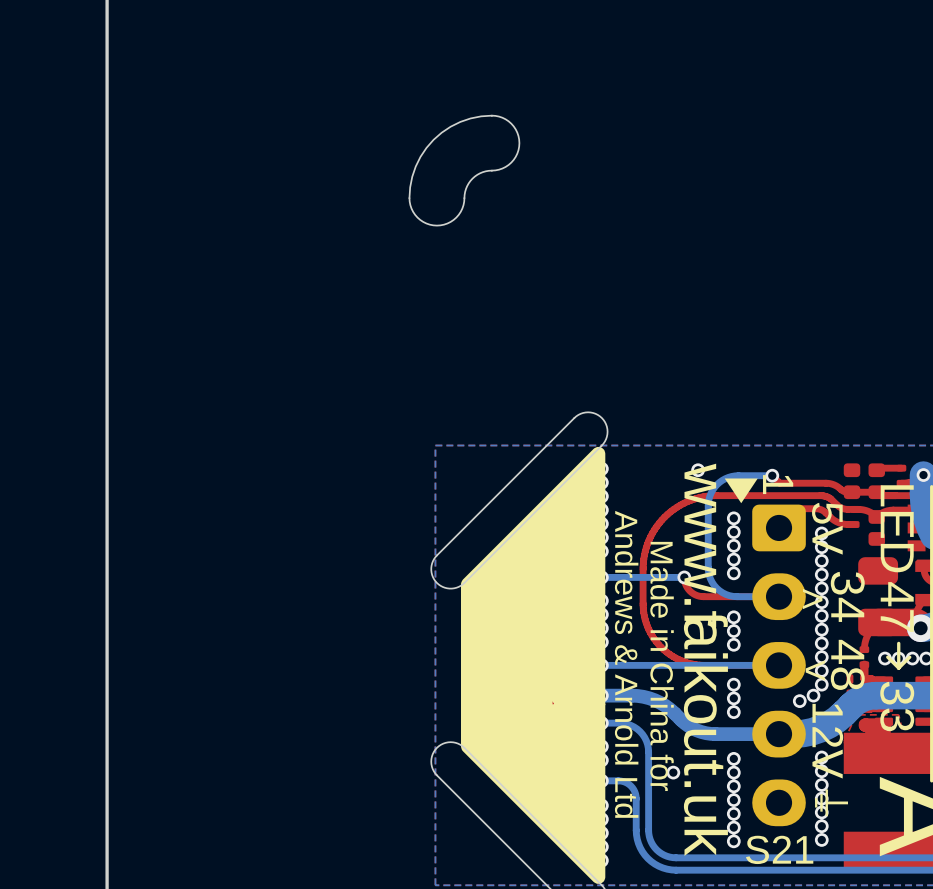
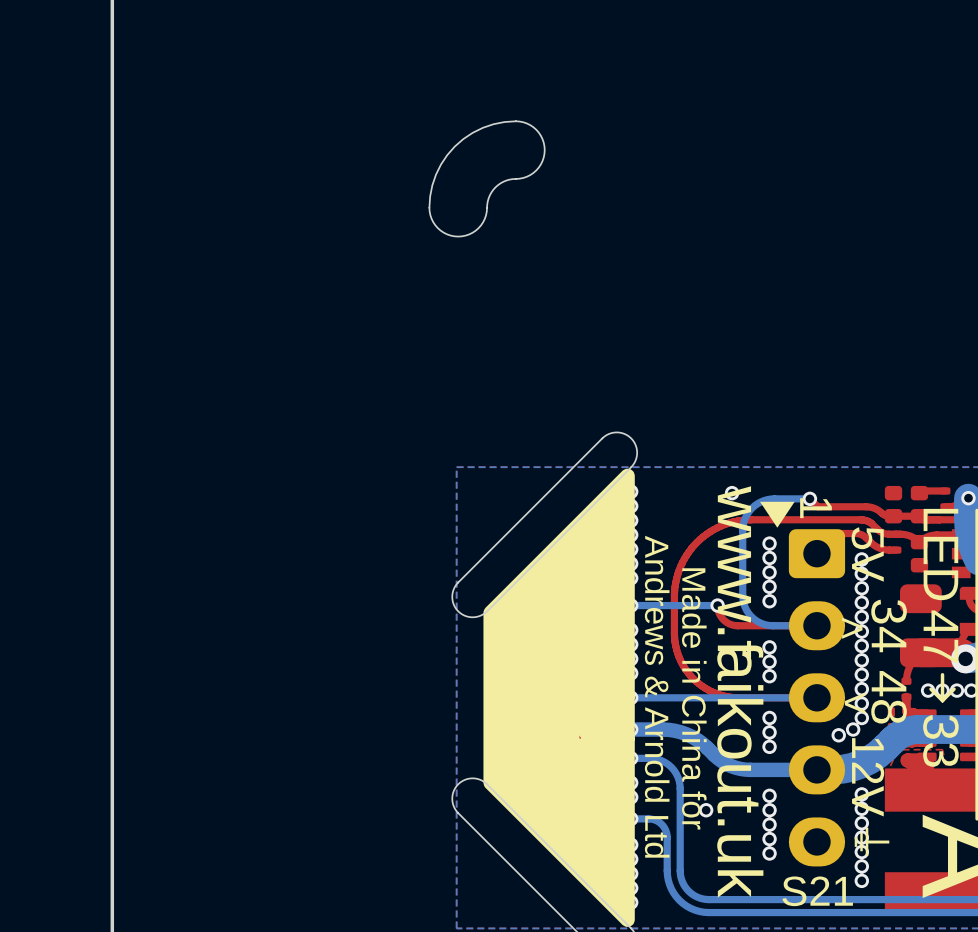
via: (733, 827) -> none
via: (733, 841) -> none

